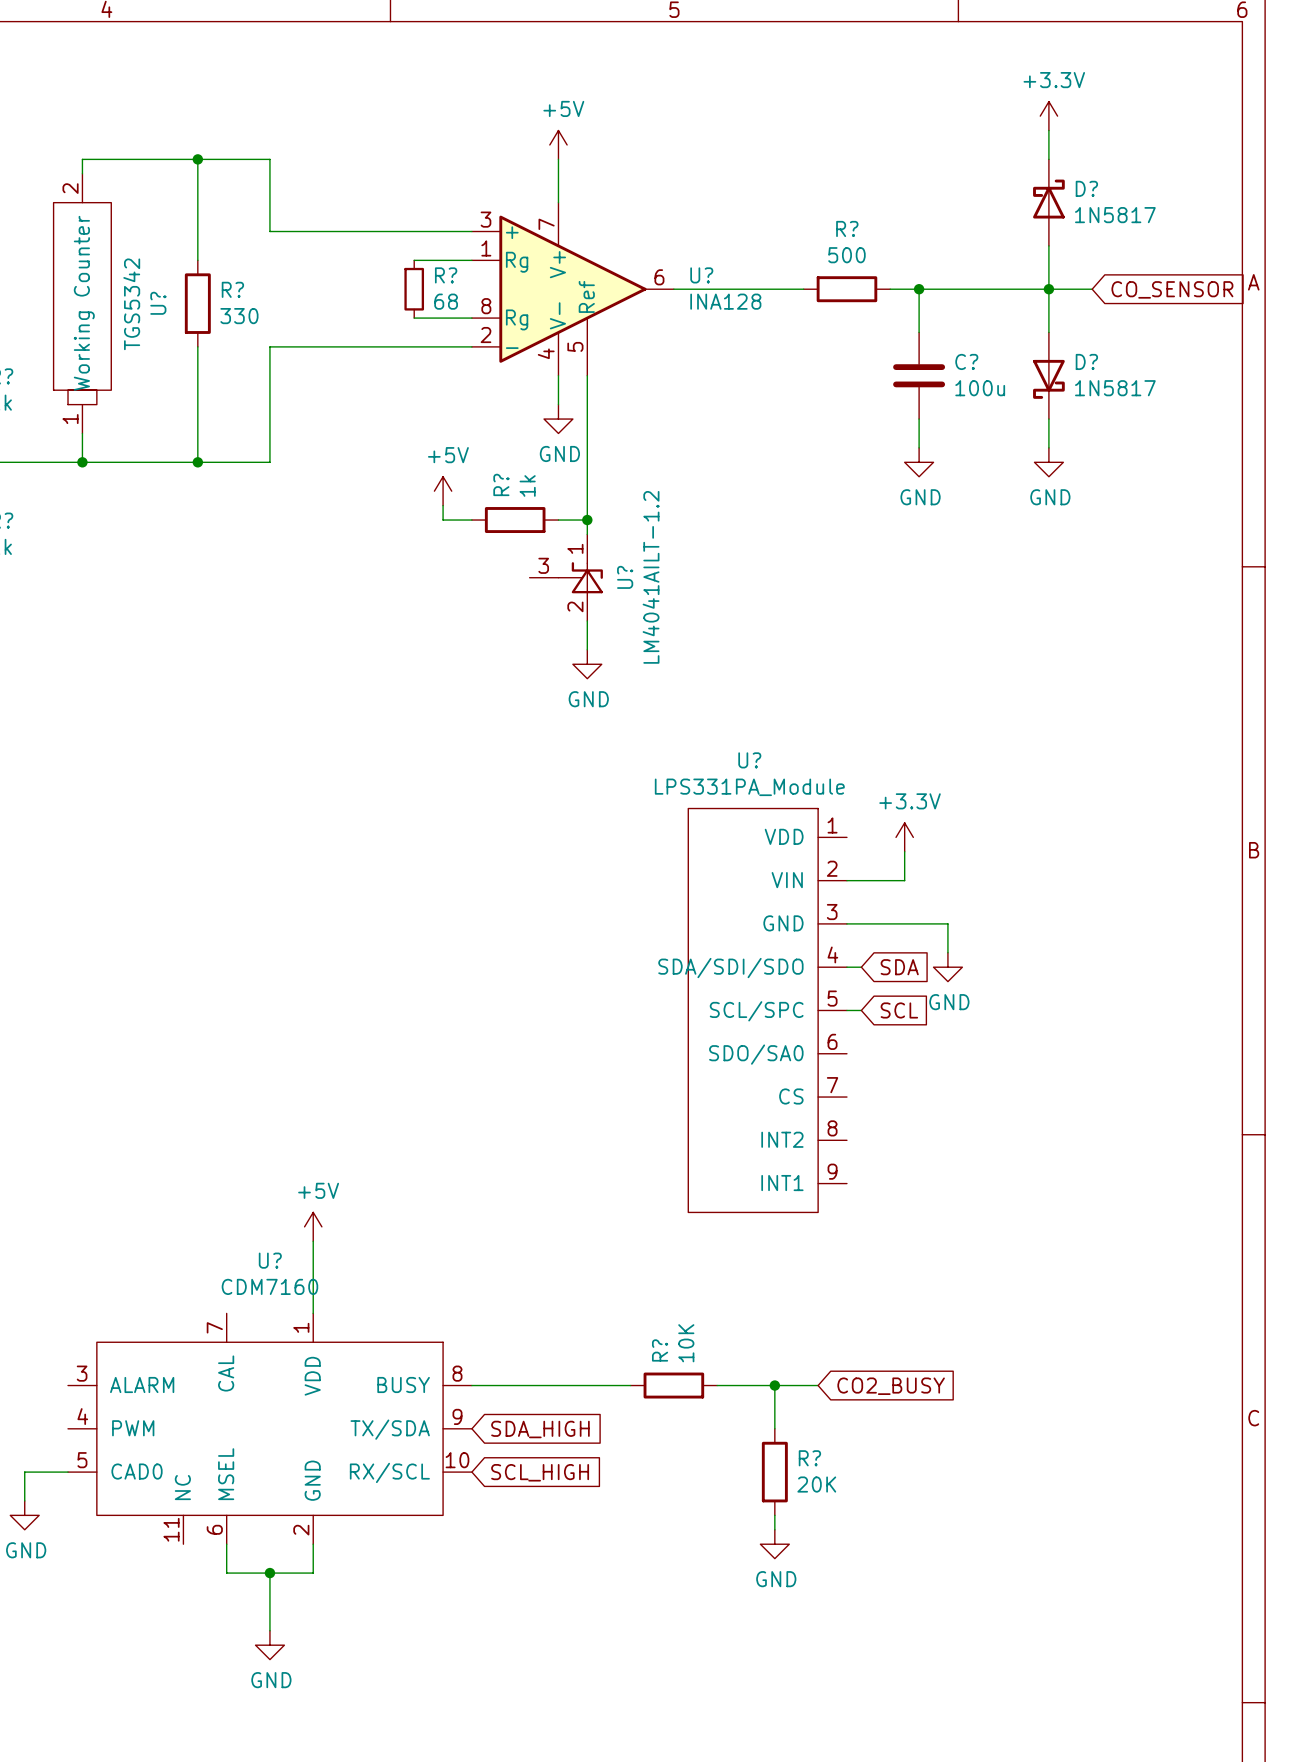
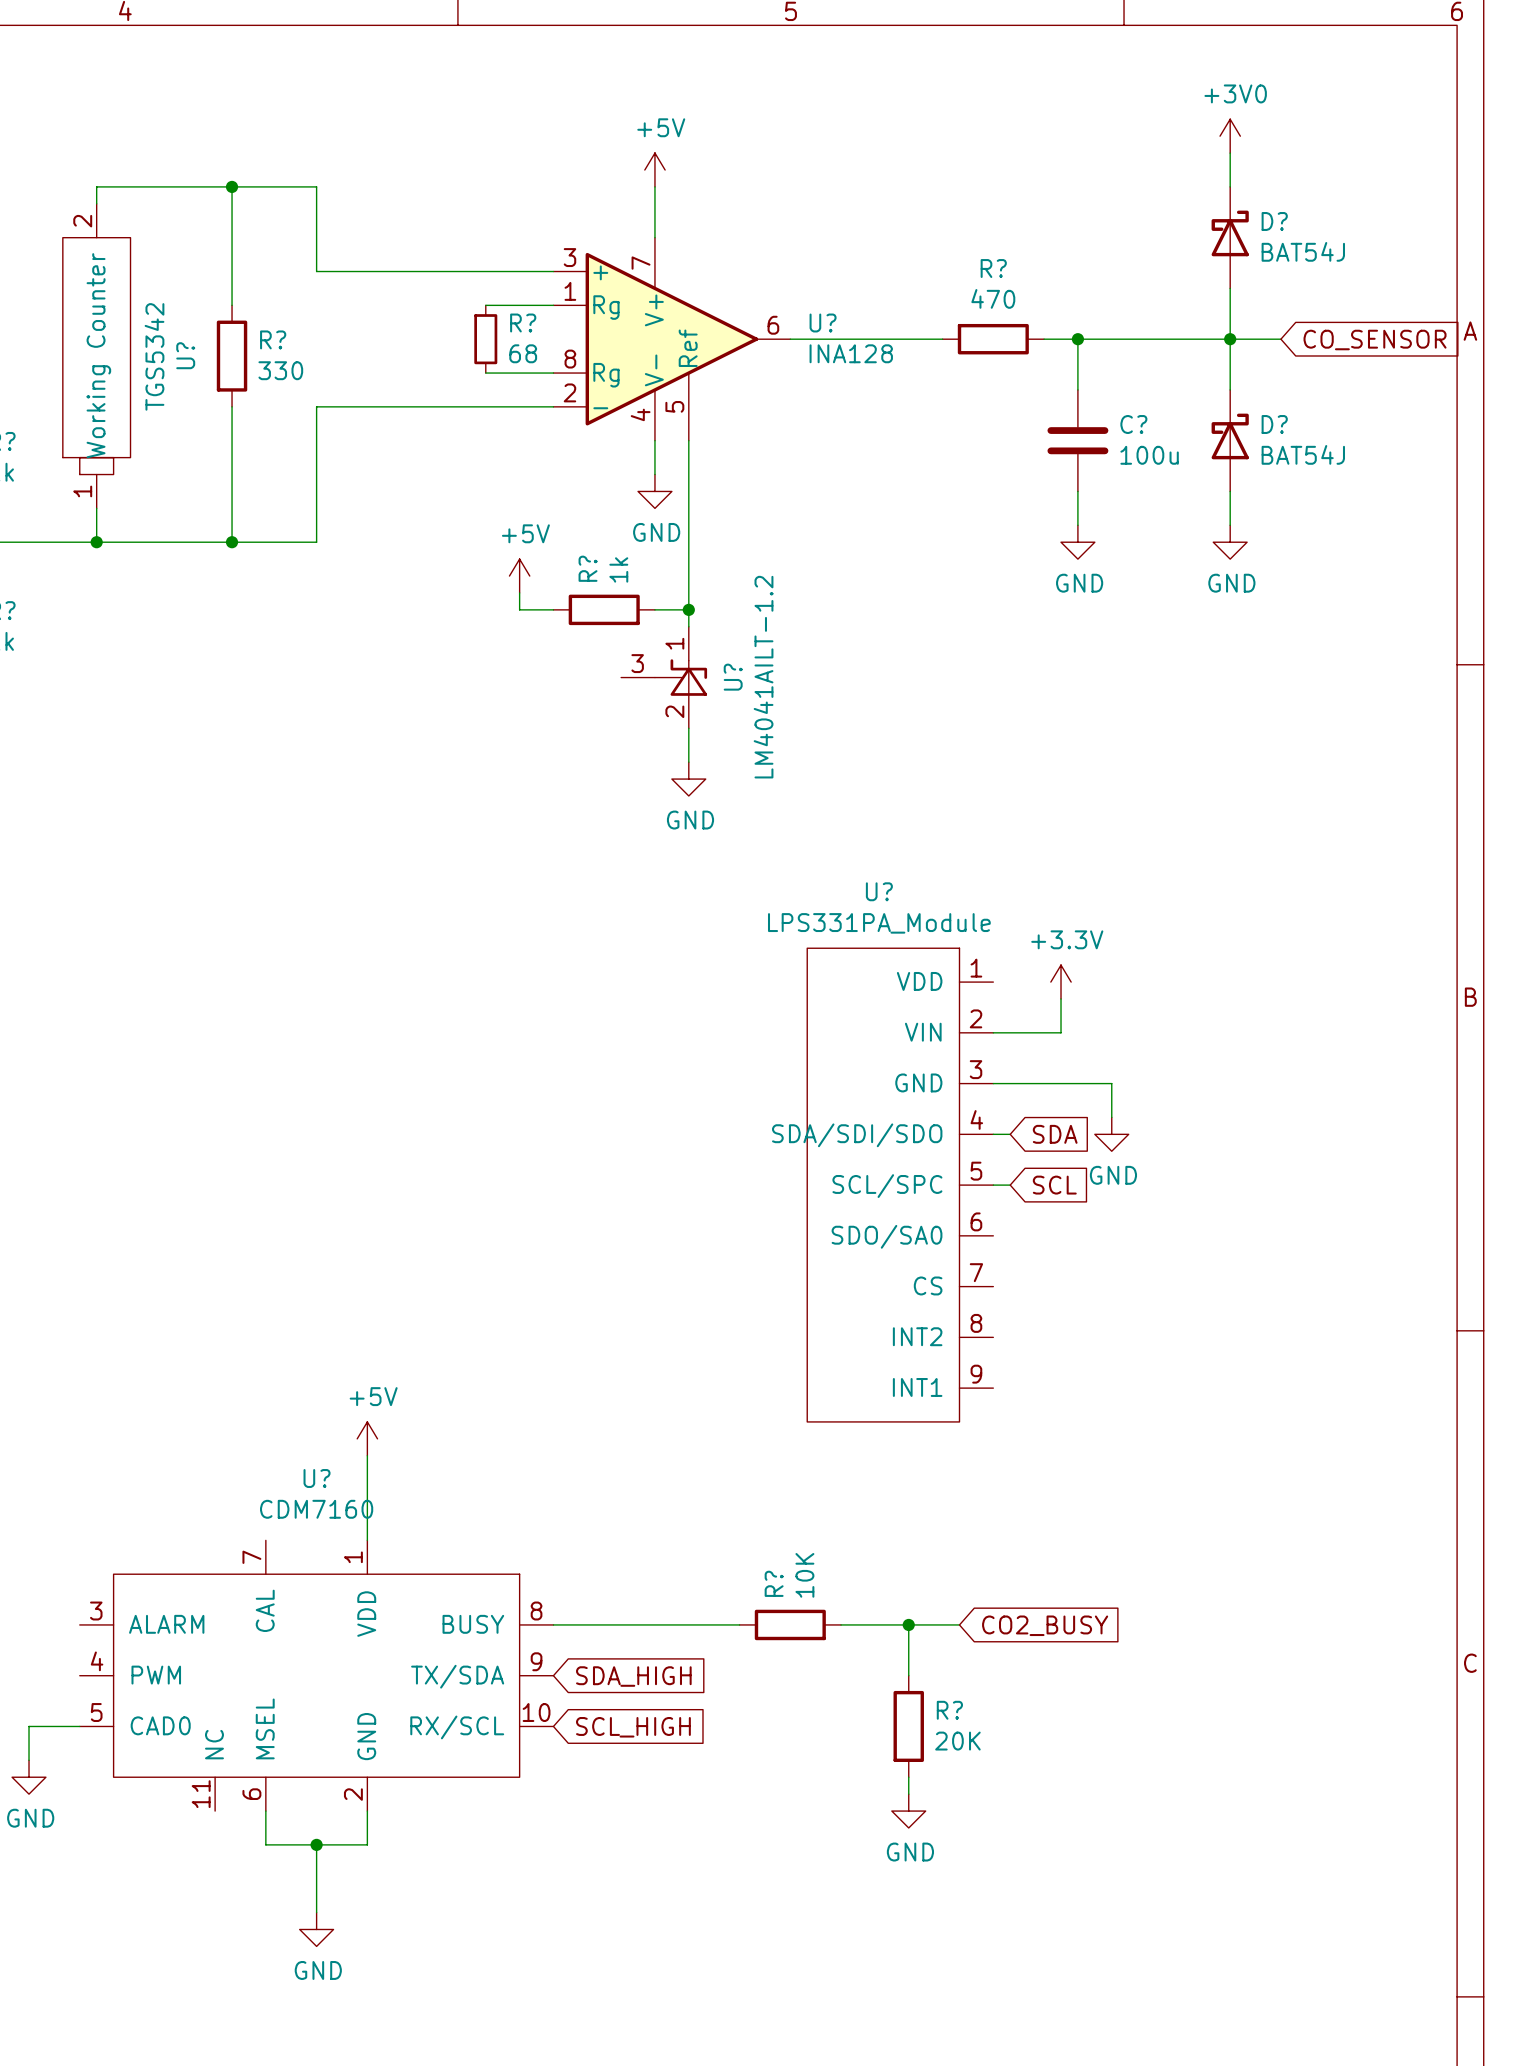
power symbol: +3.3V (1048, 116) -> +3V0 (1230, 136)
D? value: 1N5817 (1115, 215) -> BAT54J (1303, 251)
R? value: 500 (846, 255) -> 470 (993, 298)
D? rotation: 0° (1048, 379) -> 180° (1230, 436)
D? value: 1N5817 (1115, 388) -> BAT54J (1303, 454)

